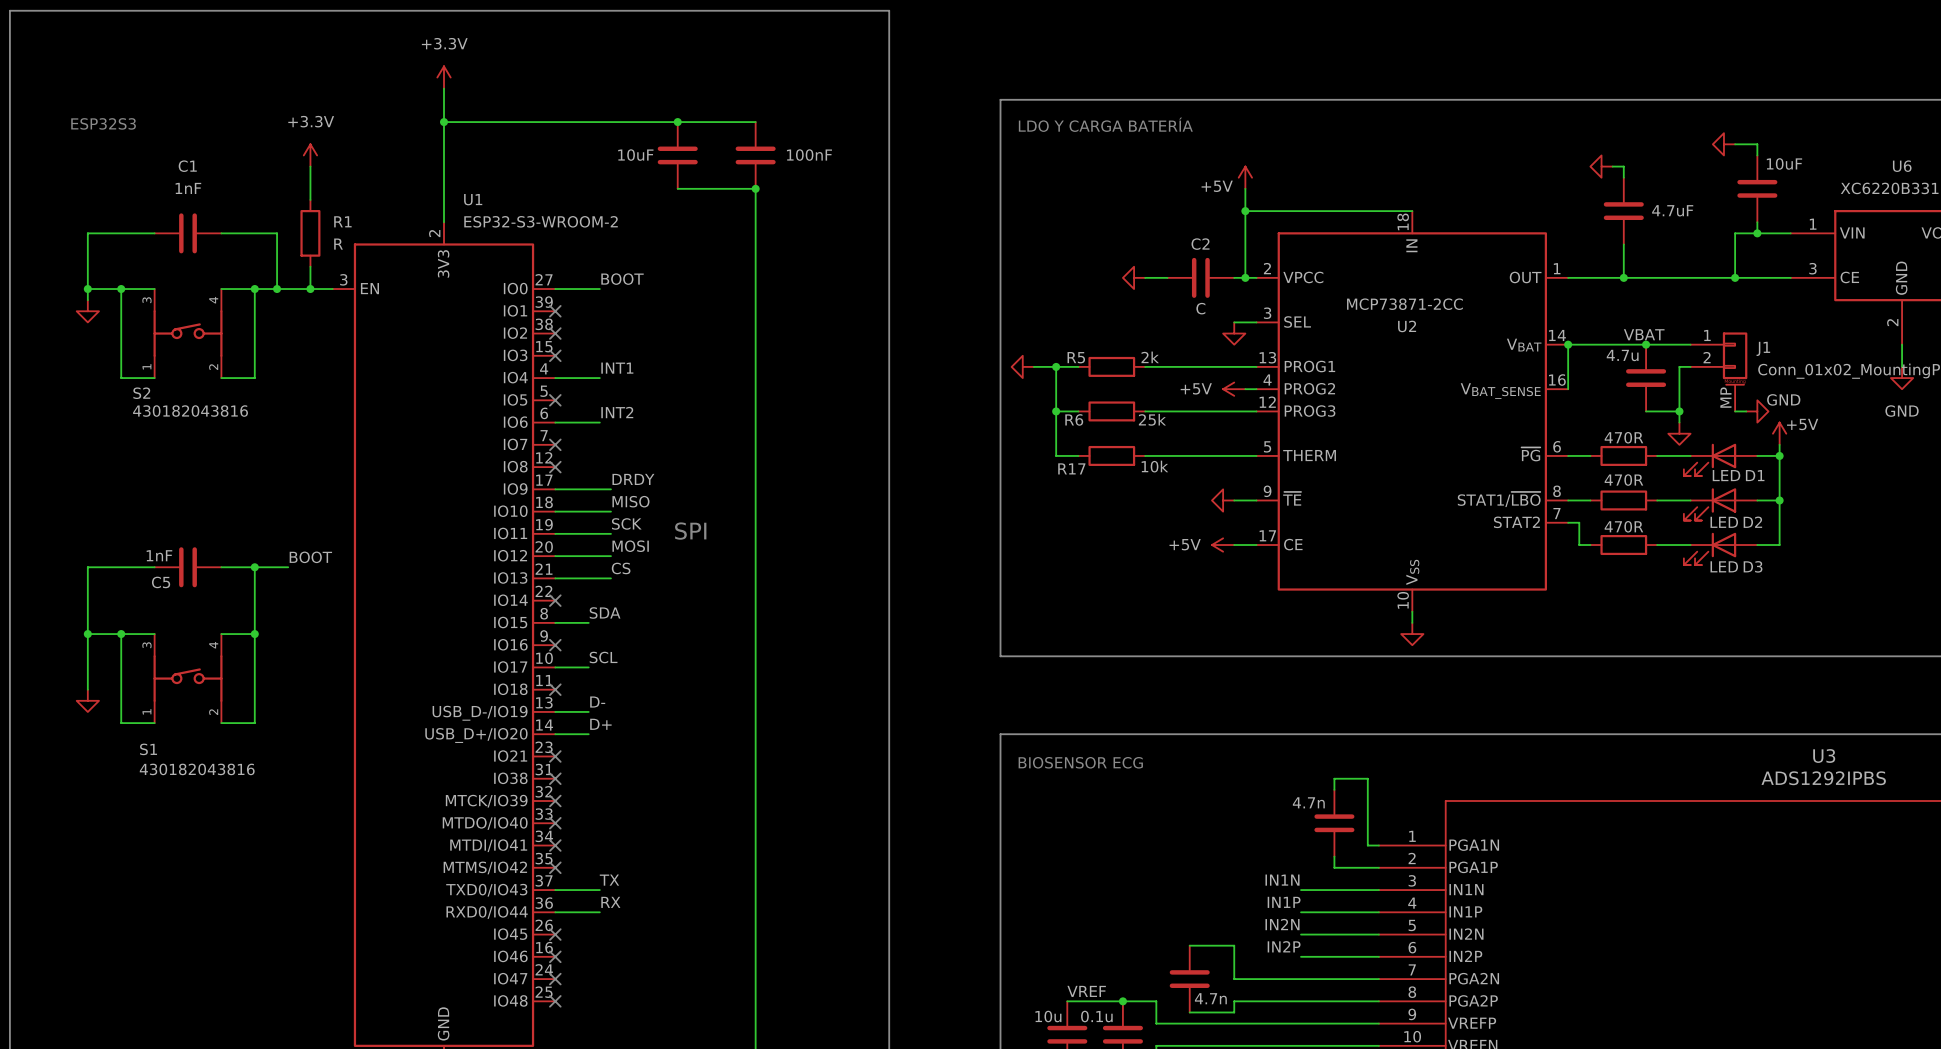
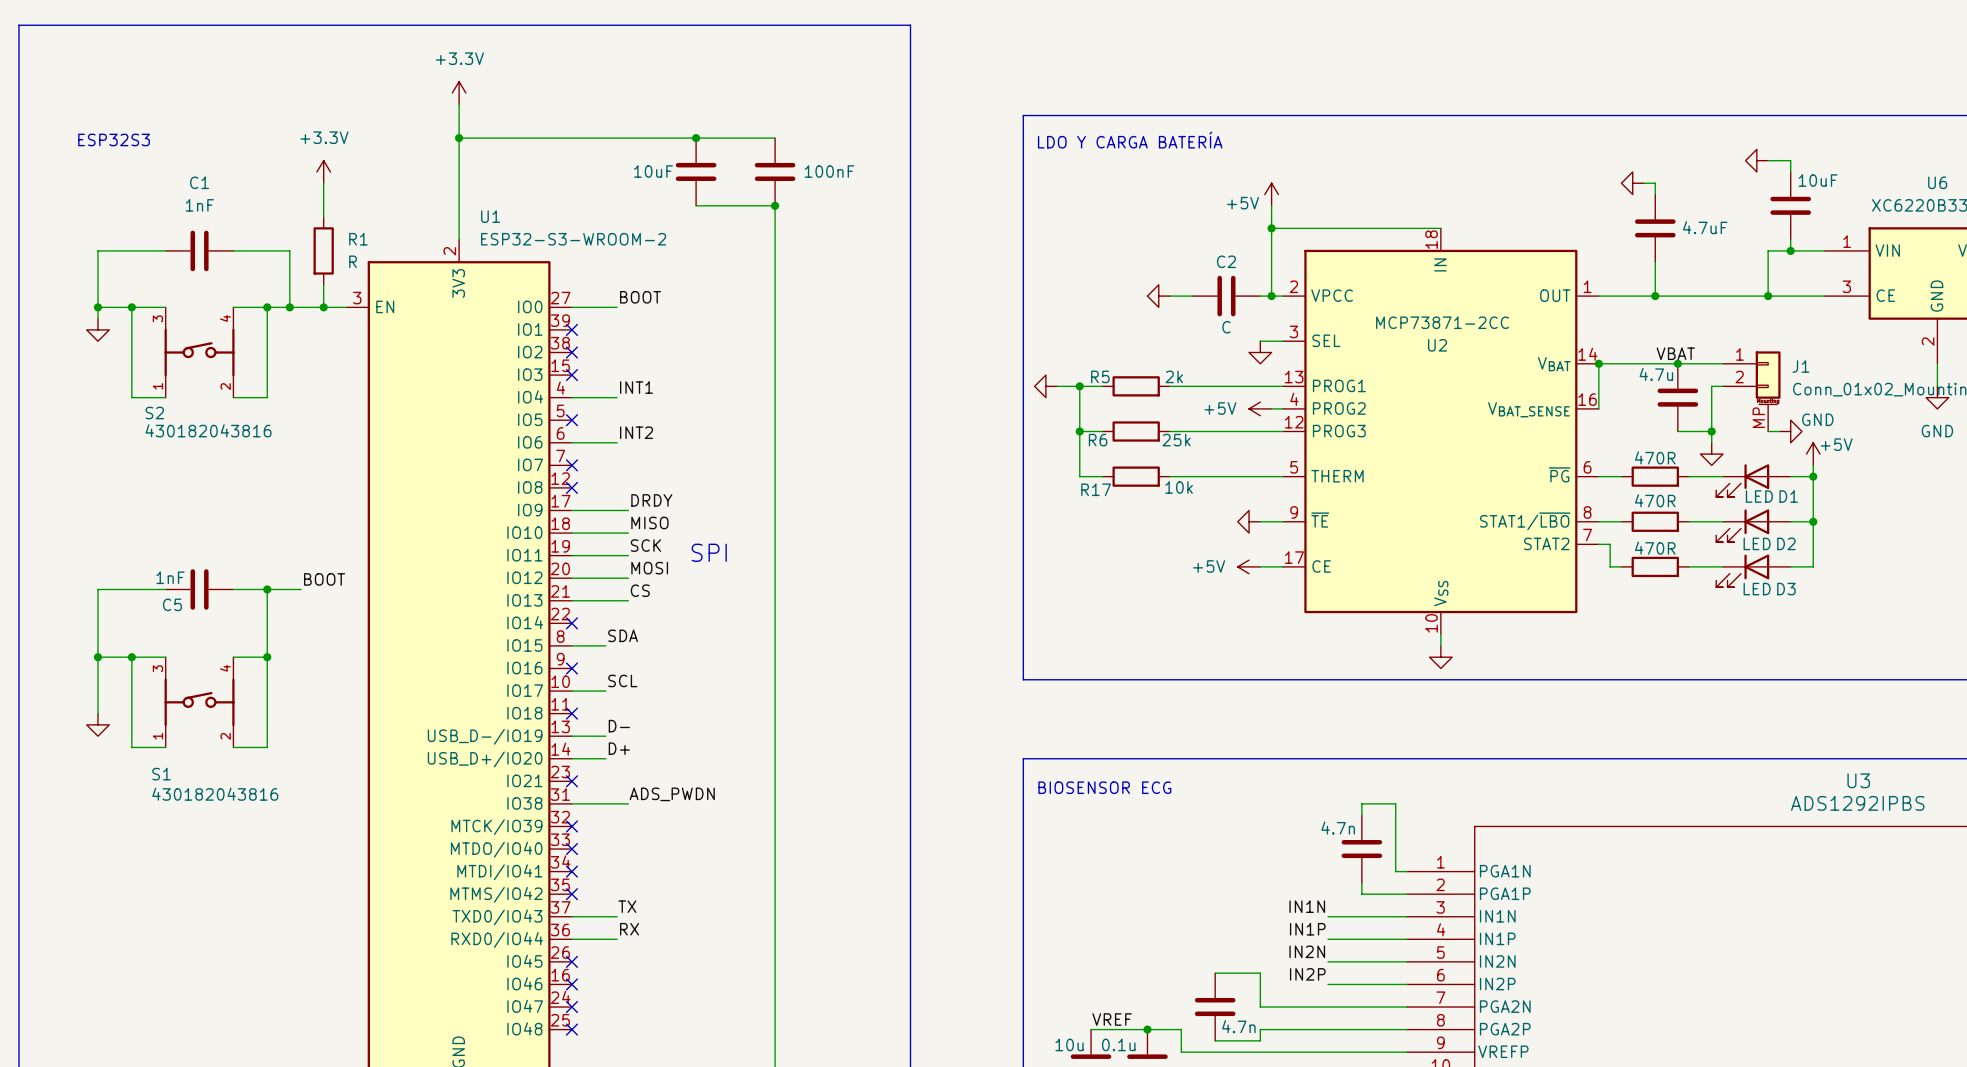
label: none -> ADS_PWDN (672, 794)
wire: none -> (571, 803) (628, 803)
no-connect mark: (555, 778) -> none

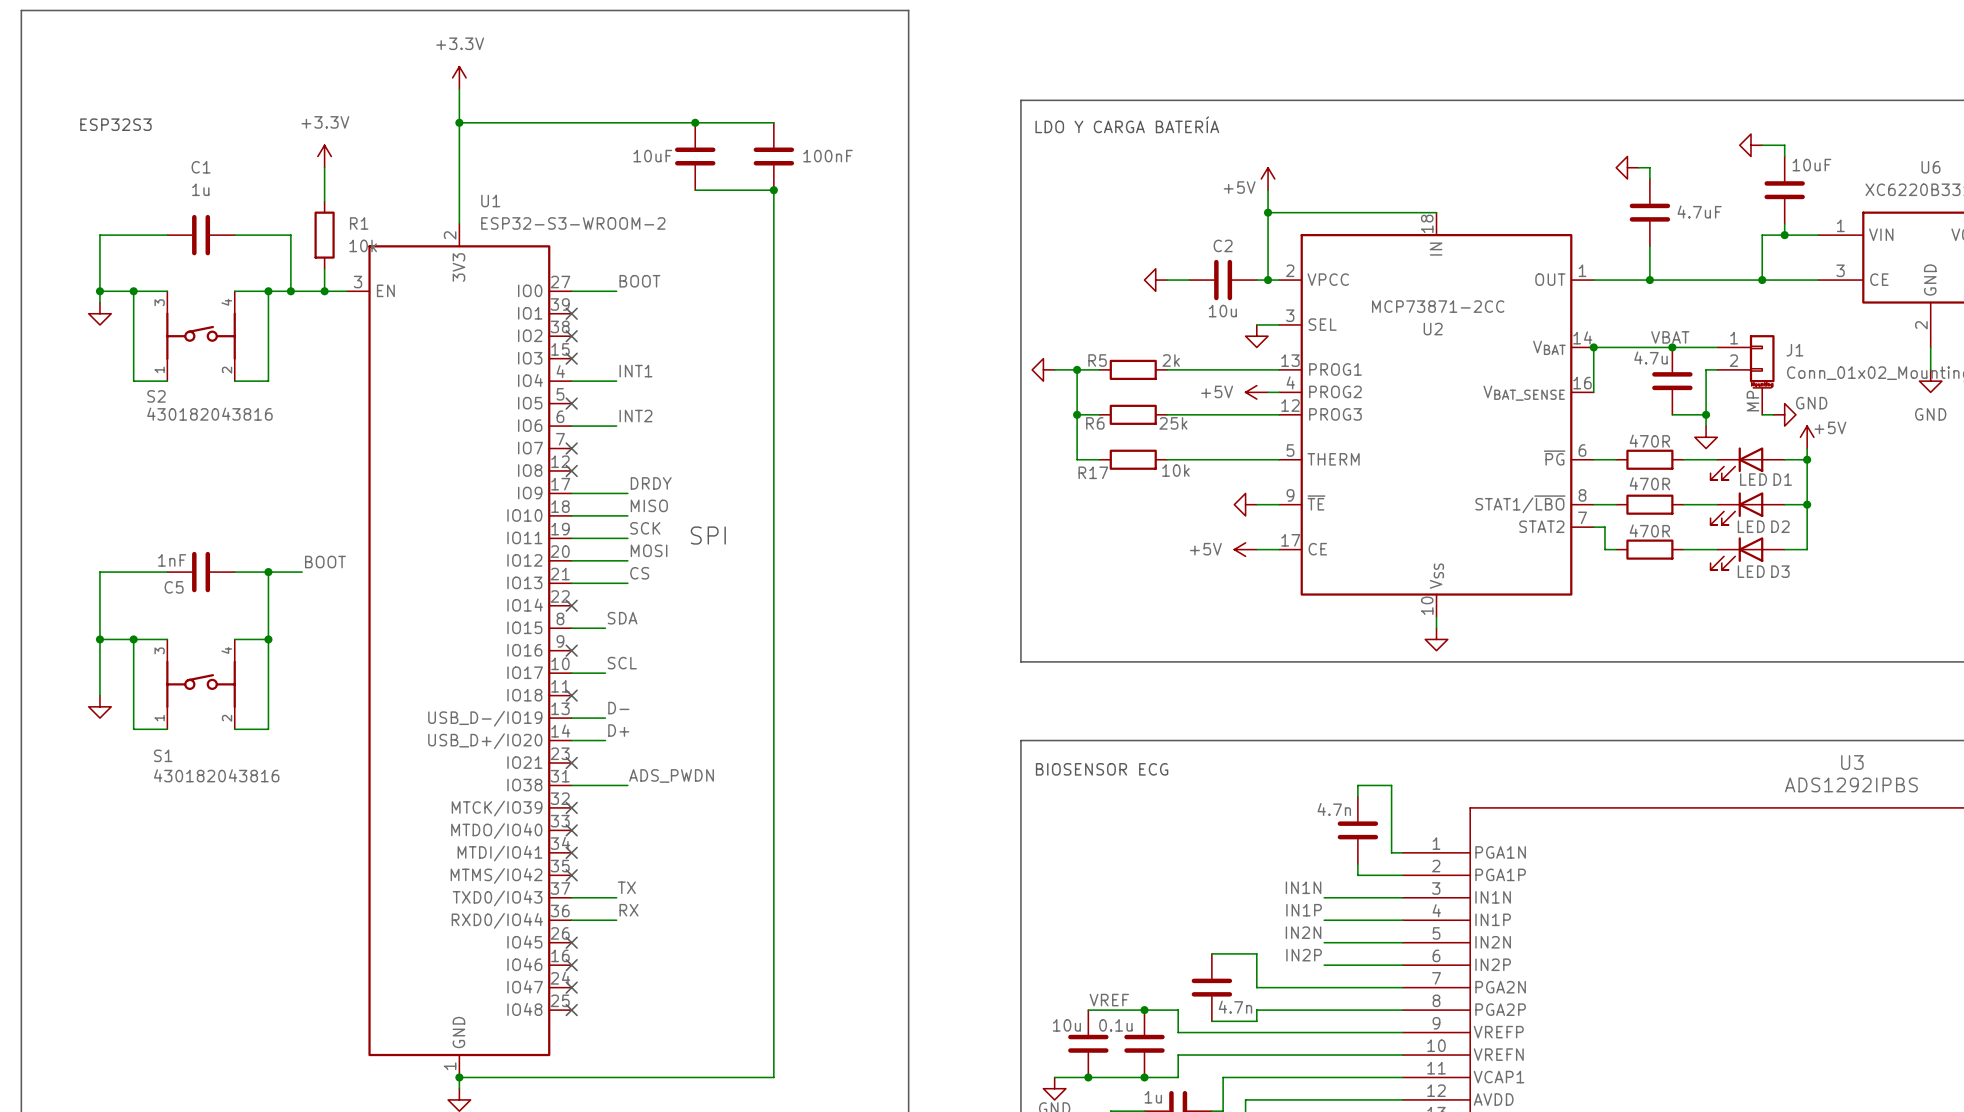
C1 value: 1nF (199, 205) -> 1u (200, 189)
R1 value: R (353, 261) -> 10k (363, 245)
C2 value: C (1226, 327) -> 10u (1222, 311)

